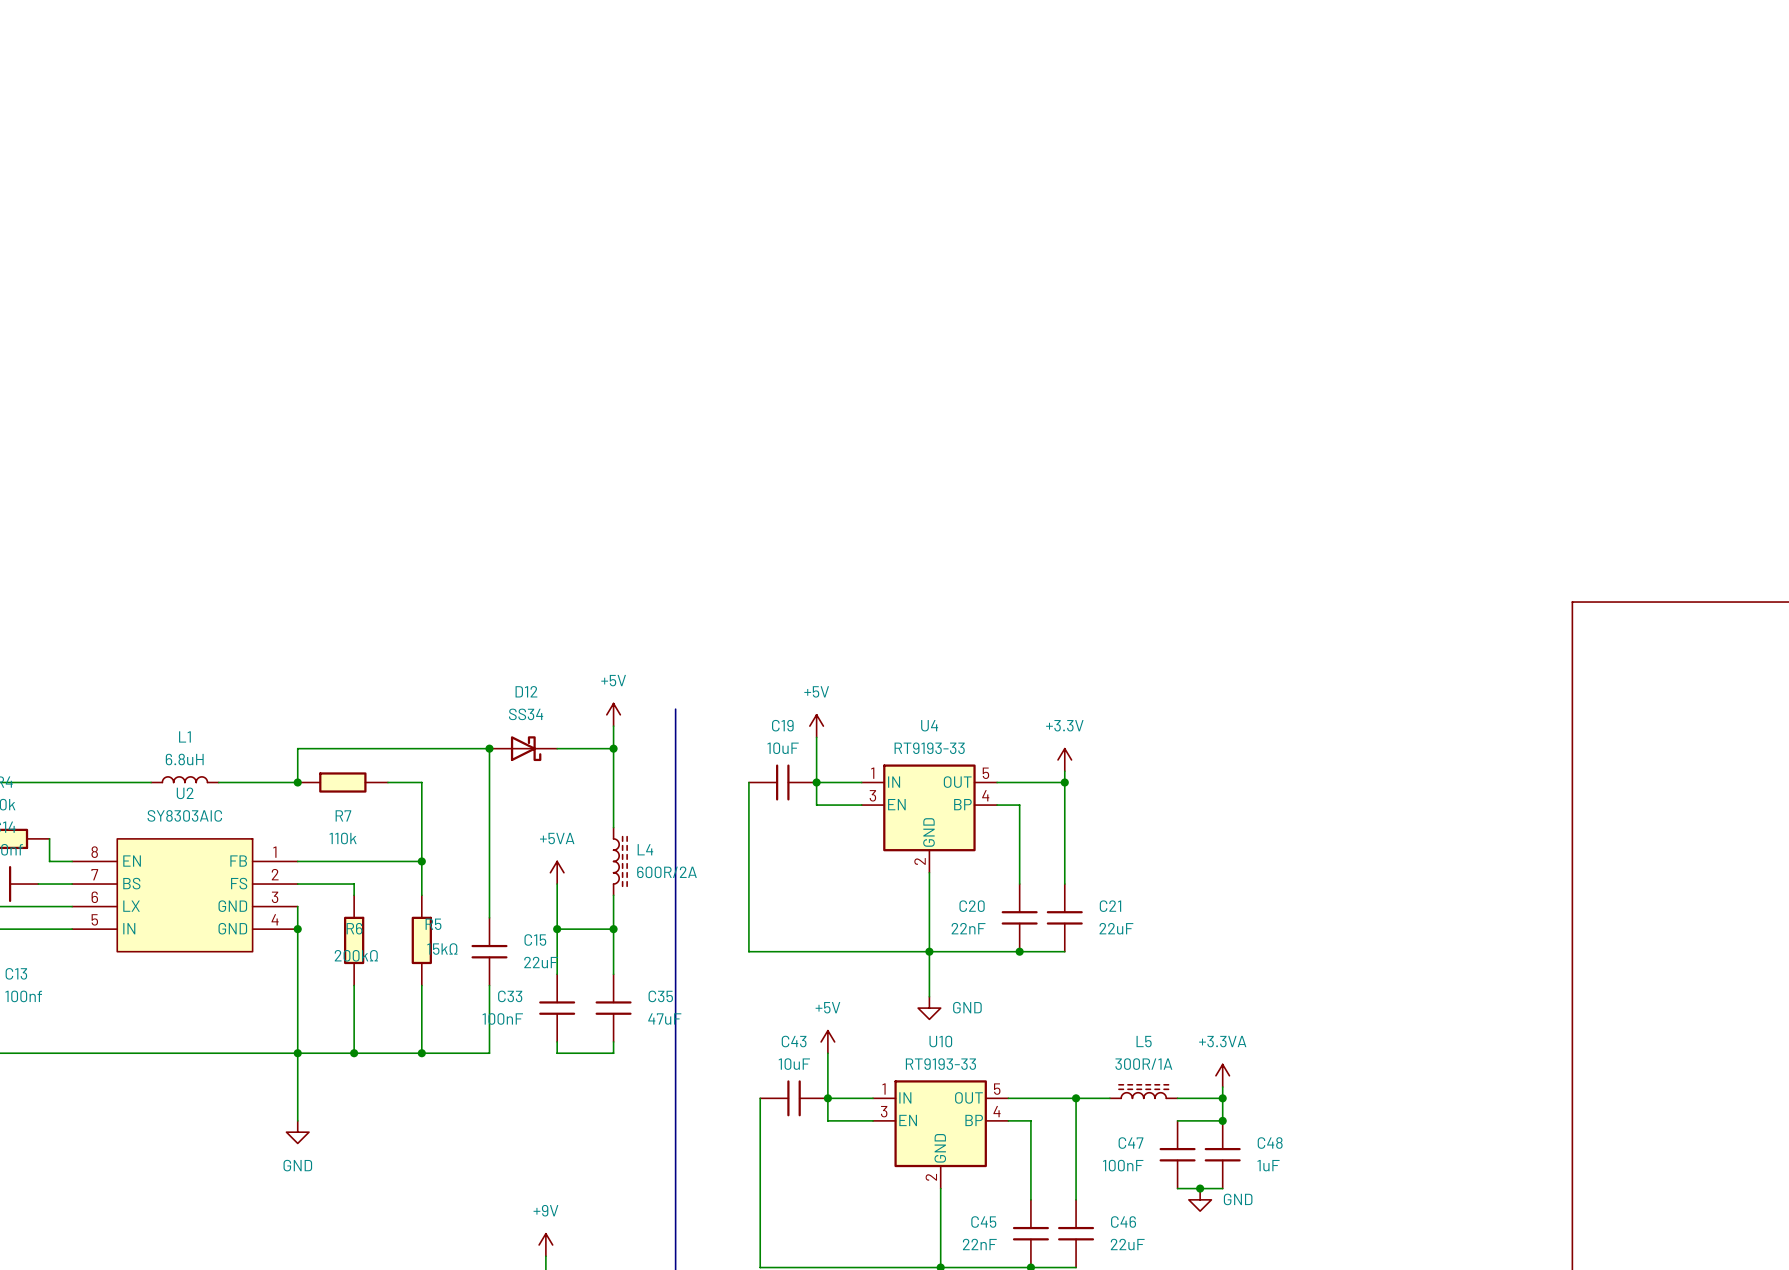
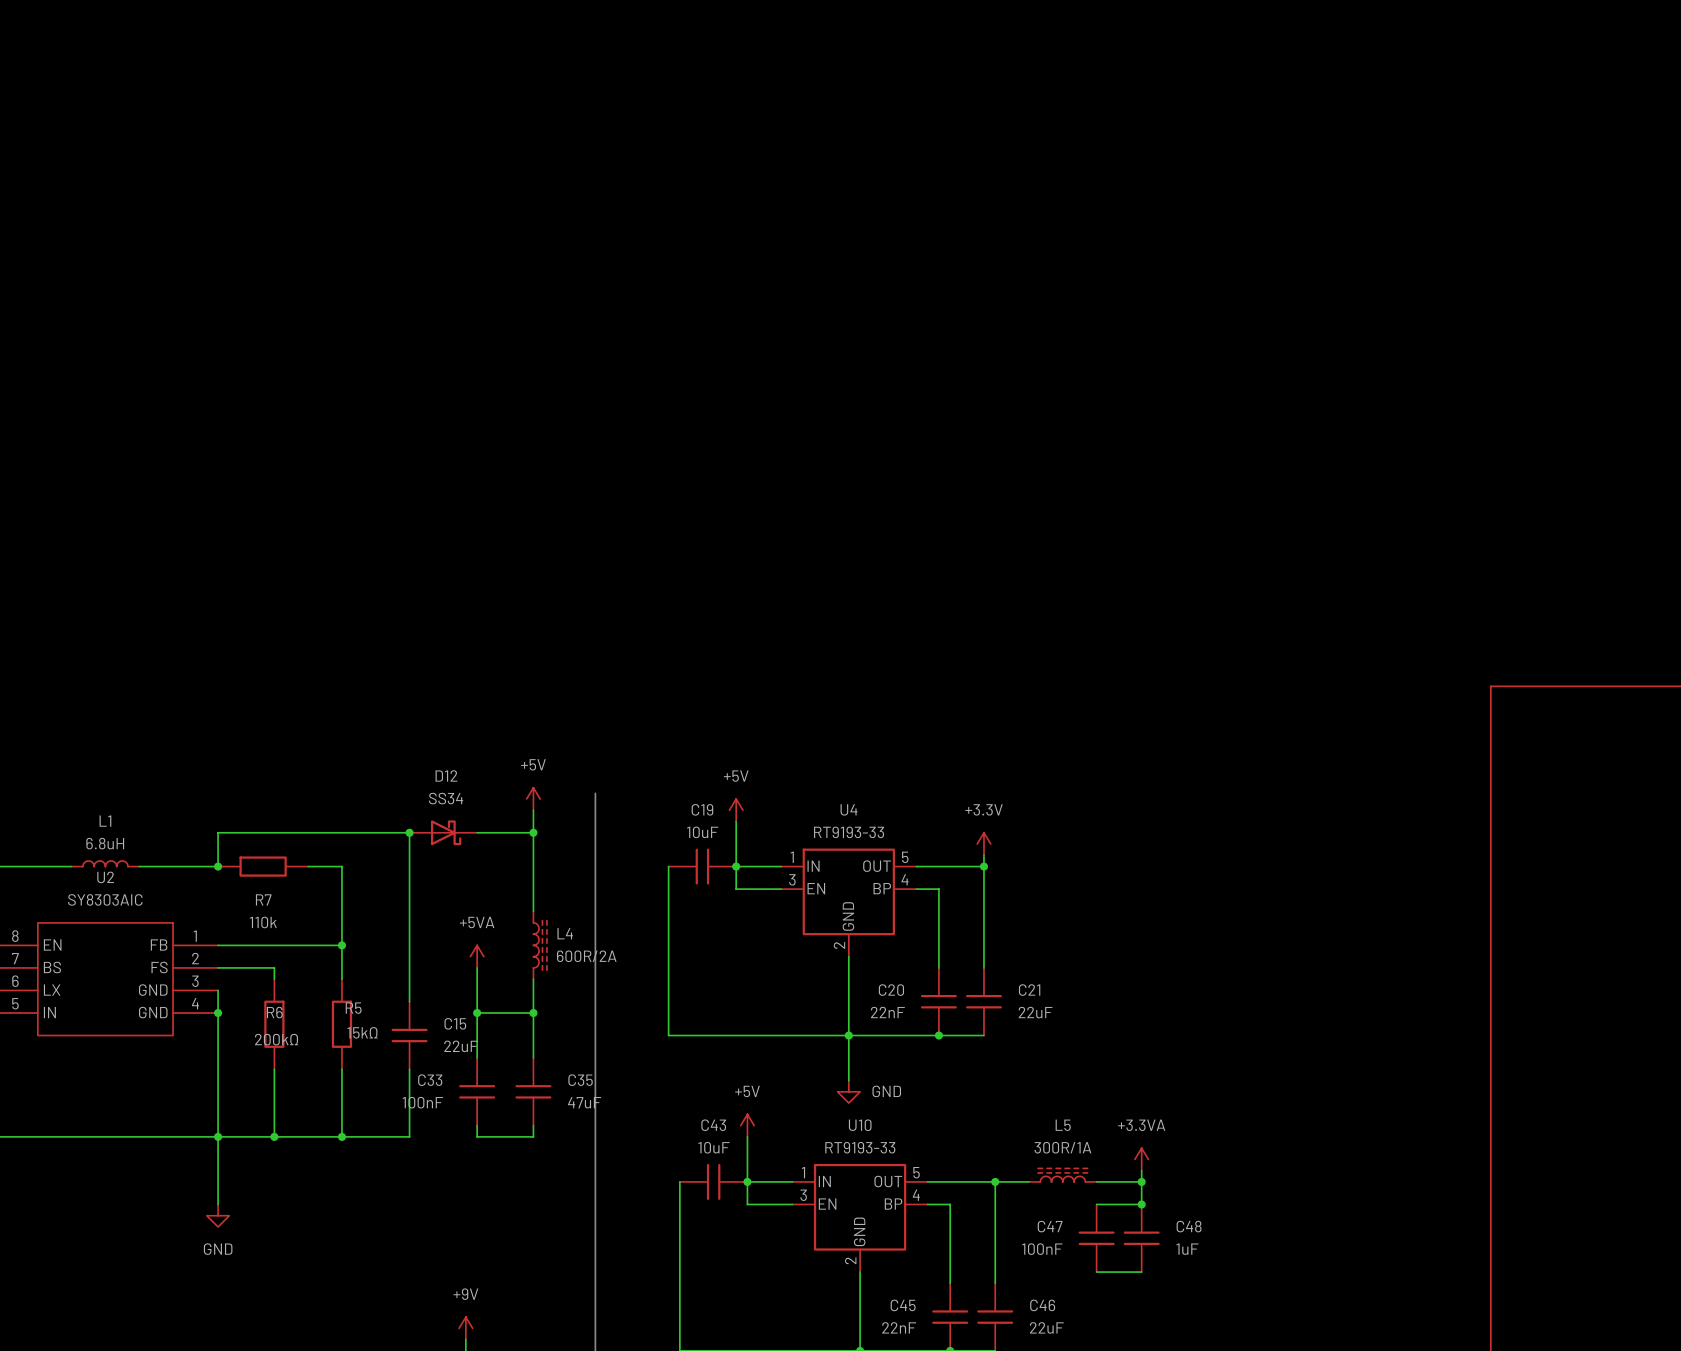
junction: (1200, 1188) -> none
power symbol: GND (1200, 1199) -> none

